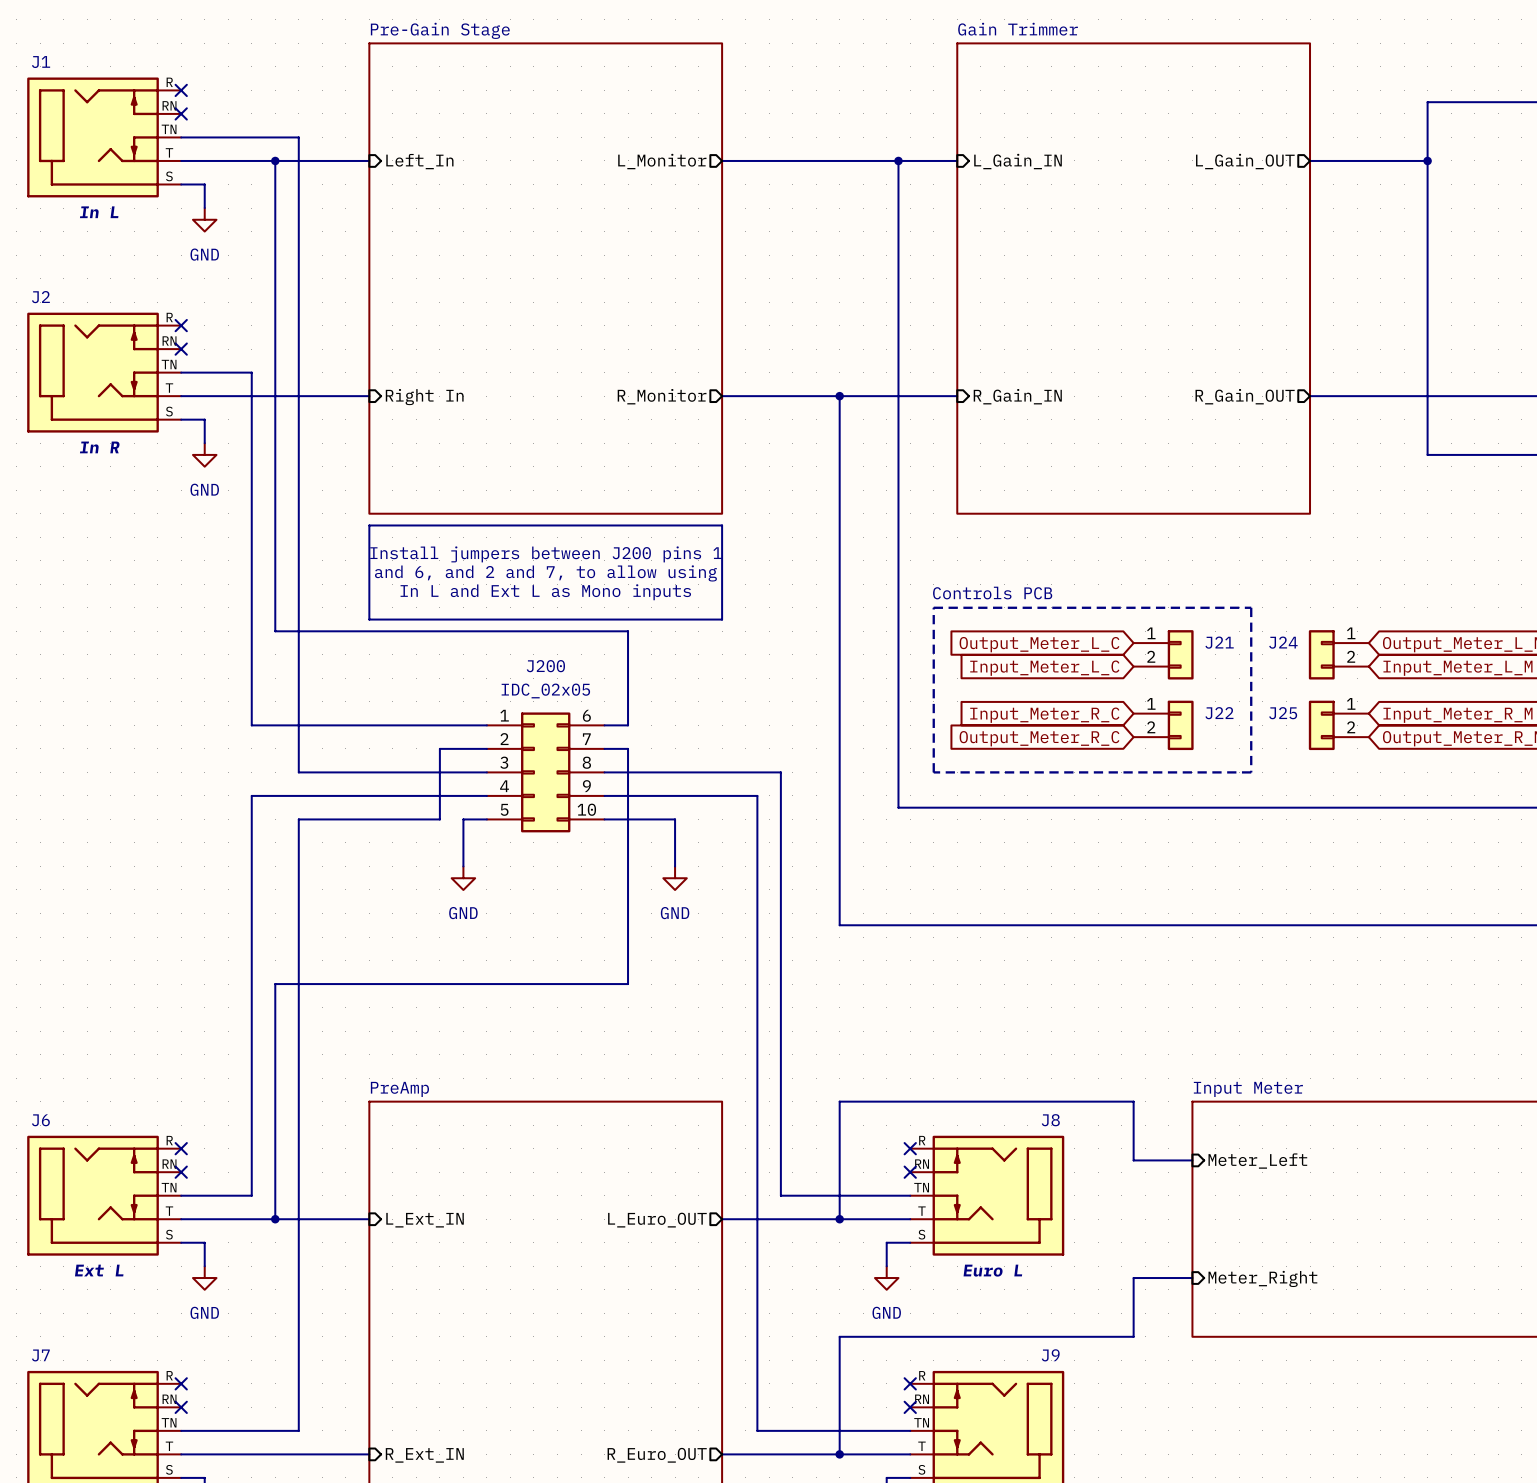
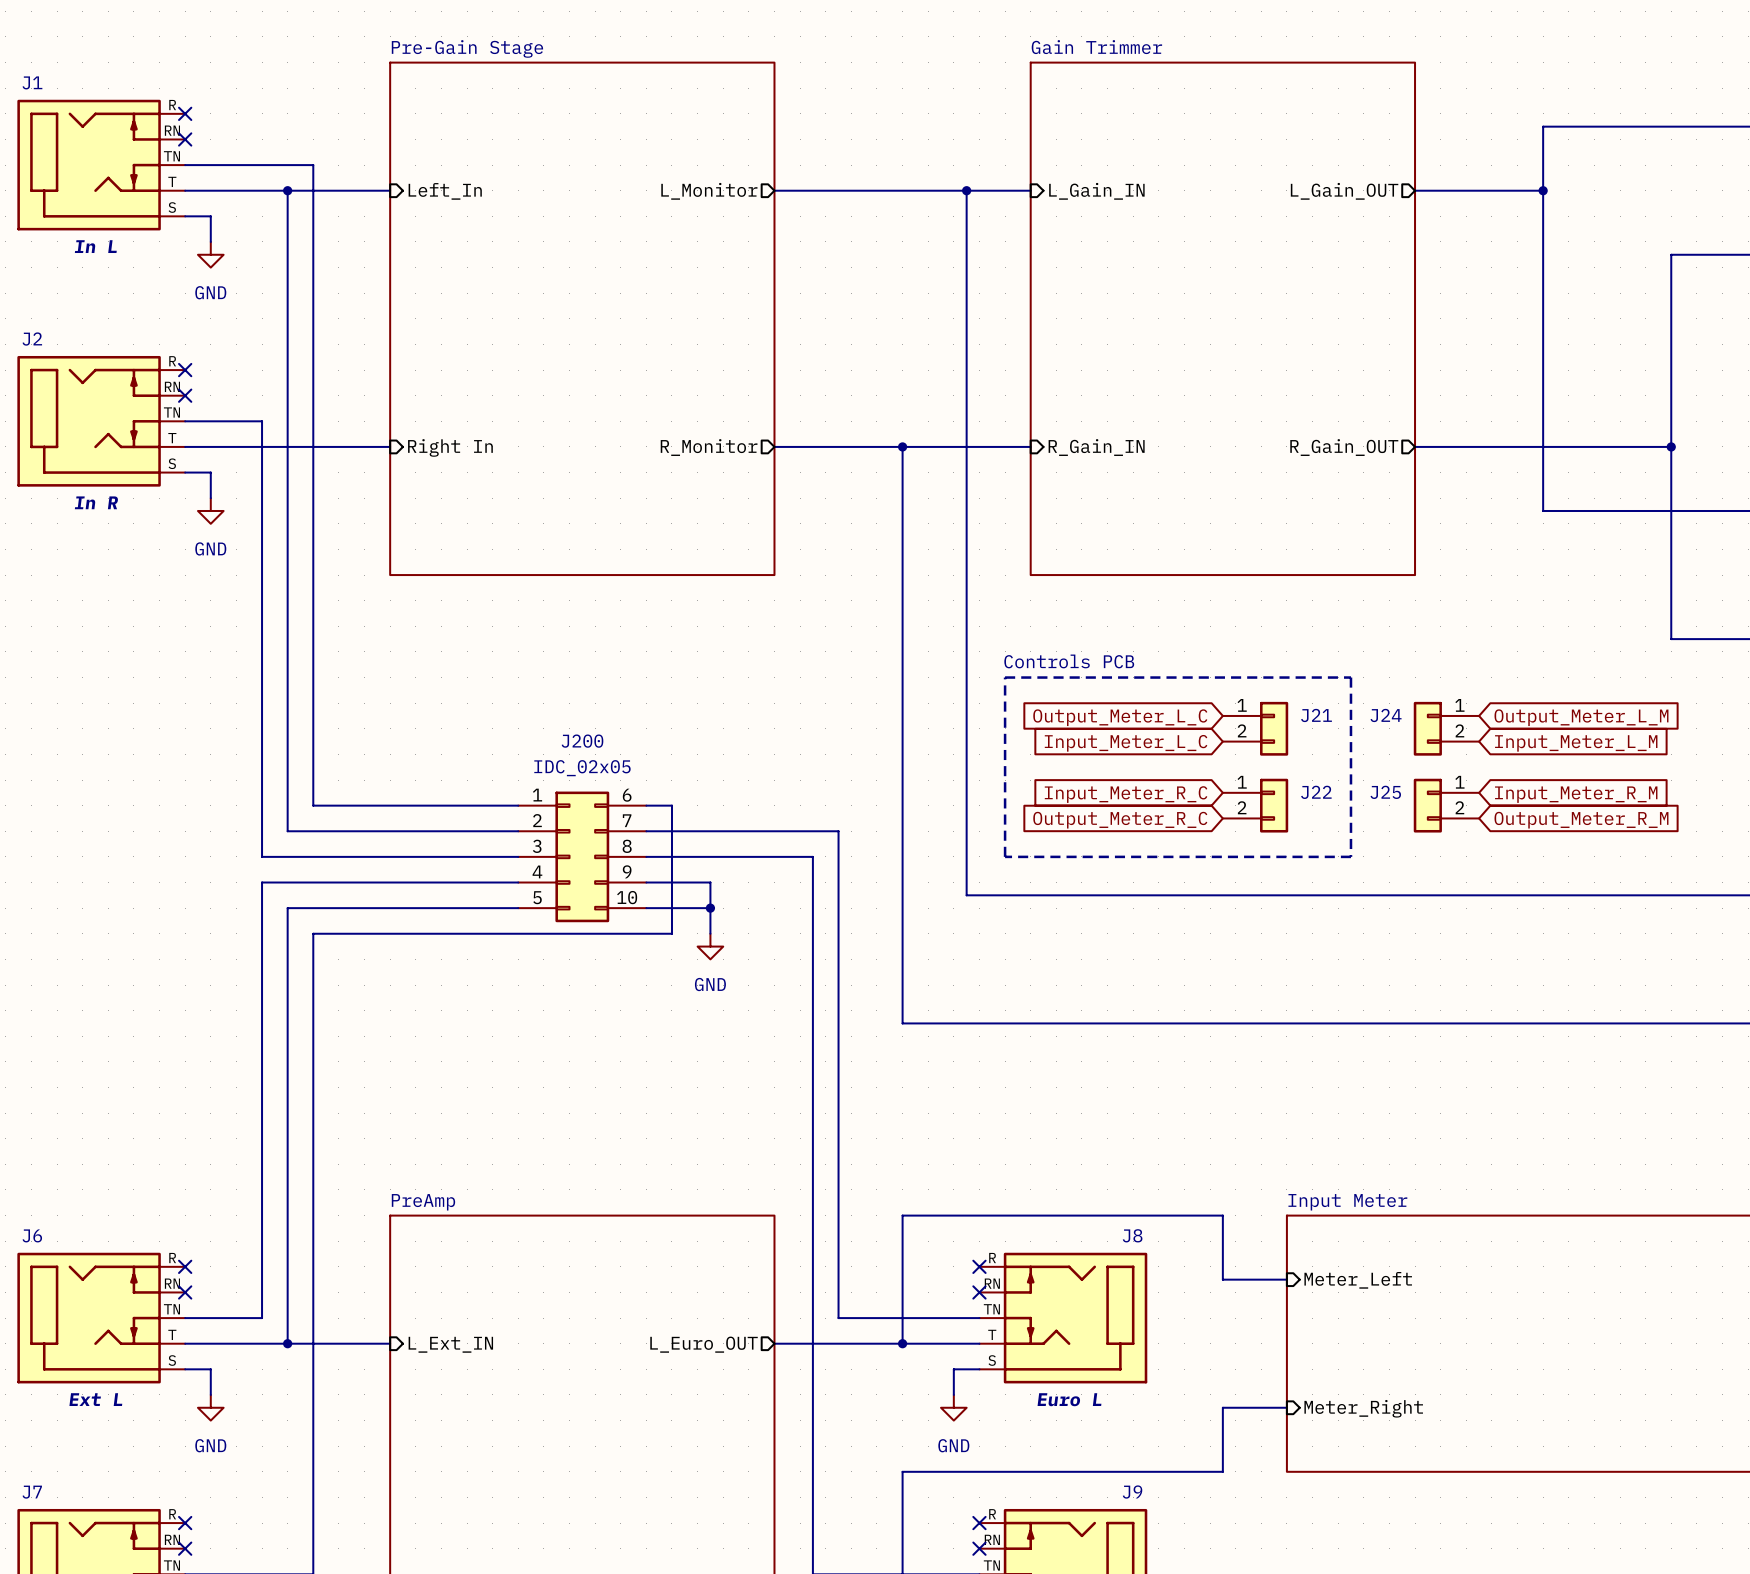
line: (369, 525) (722, 525) (722, 619) (369, 619) (369, 525) -> none
text: Install jumpers between J200 pins 1 (546, 554) -> none
text: and 6, and 2 and 7, to allow using (545, 573) -> none
text: In L and Ext L as Mono inputs (545, 592) -> none
wire: (275, 631) (628, 631) (628, 725) -> (287, 703) (287, 831) (467, 831)
wire: (251, 725) (298, 725) (298, 772) -> (262, 805) (262, 856) (313, 856)
wire: none -> (671, 805) (671, 831) (838, 831) (838, 856)
wire: (439, 748) (439, 819) -> none
wire: (757, 772) (780, 772) -> (812, 856) (812, 882)
wire: (663, 795) (757, 795) -> (710, 882) (710, 933)
wire: (298, 819) (298, 842) -> (313, 908) (287, 908) (287, 1087)
wire: (463, 819) (463, 866) -> (492, 908) (467, 908)
wire: (663, 819) (675, 819) (675, 866) -> none
junction: none -> (710, 908)
wire: (628, 842) (628, 984) (275, 984) -> (671, 933) (313, 933)
power symbol: GND (463, 878) -> none
power symbol position: GND (675, 878) -> GND (710, 946)

